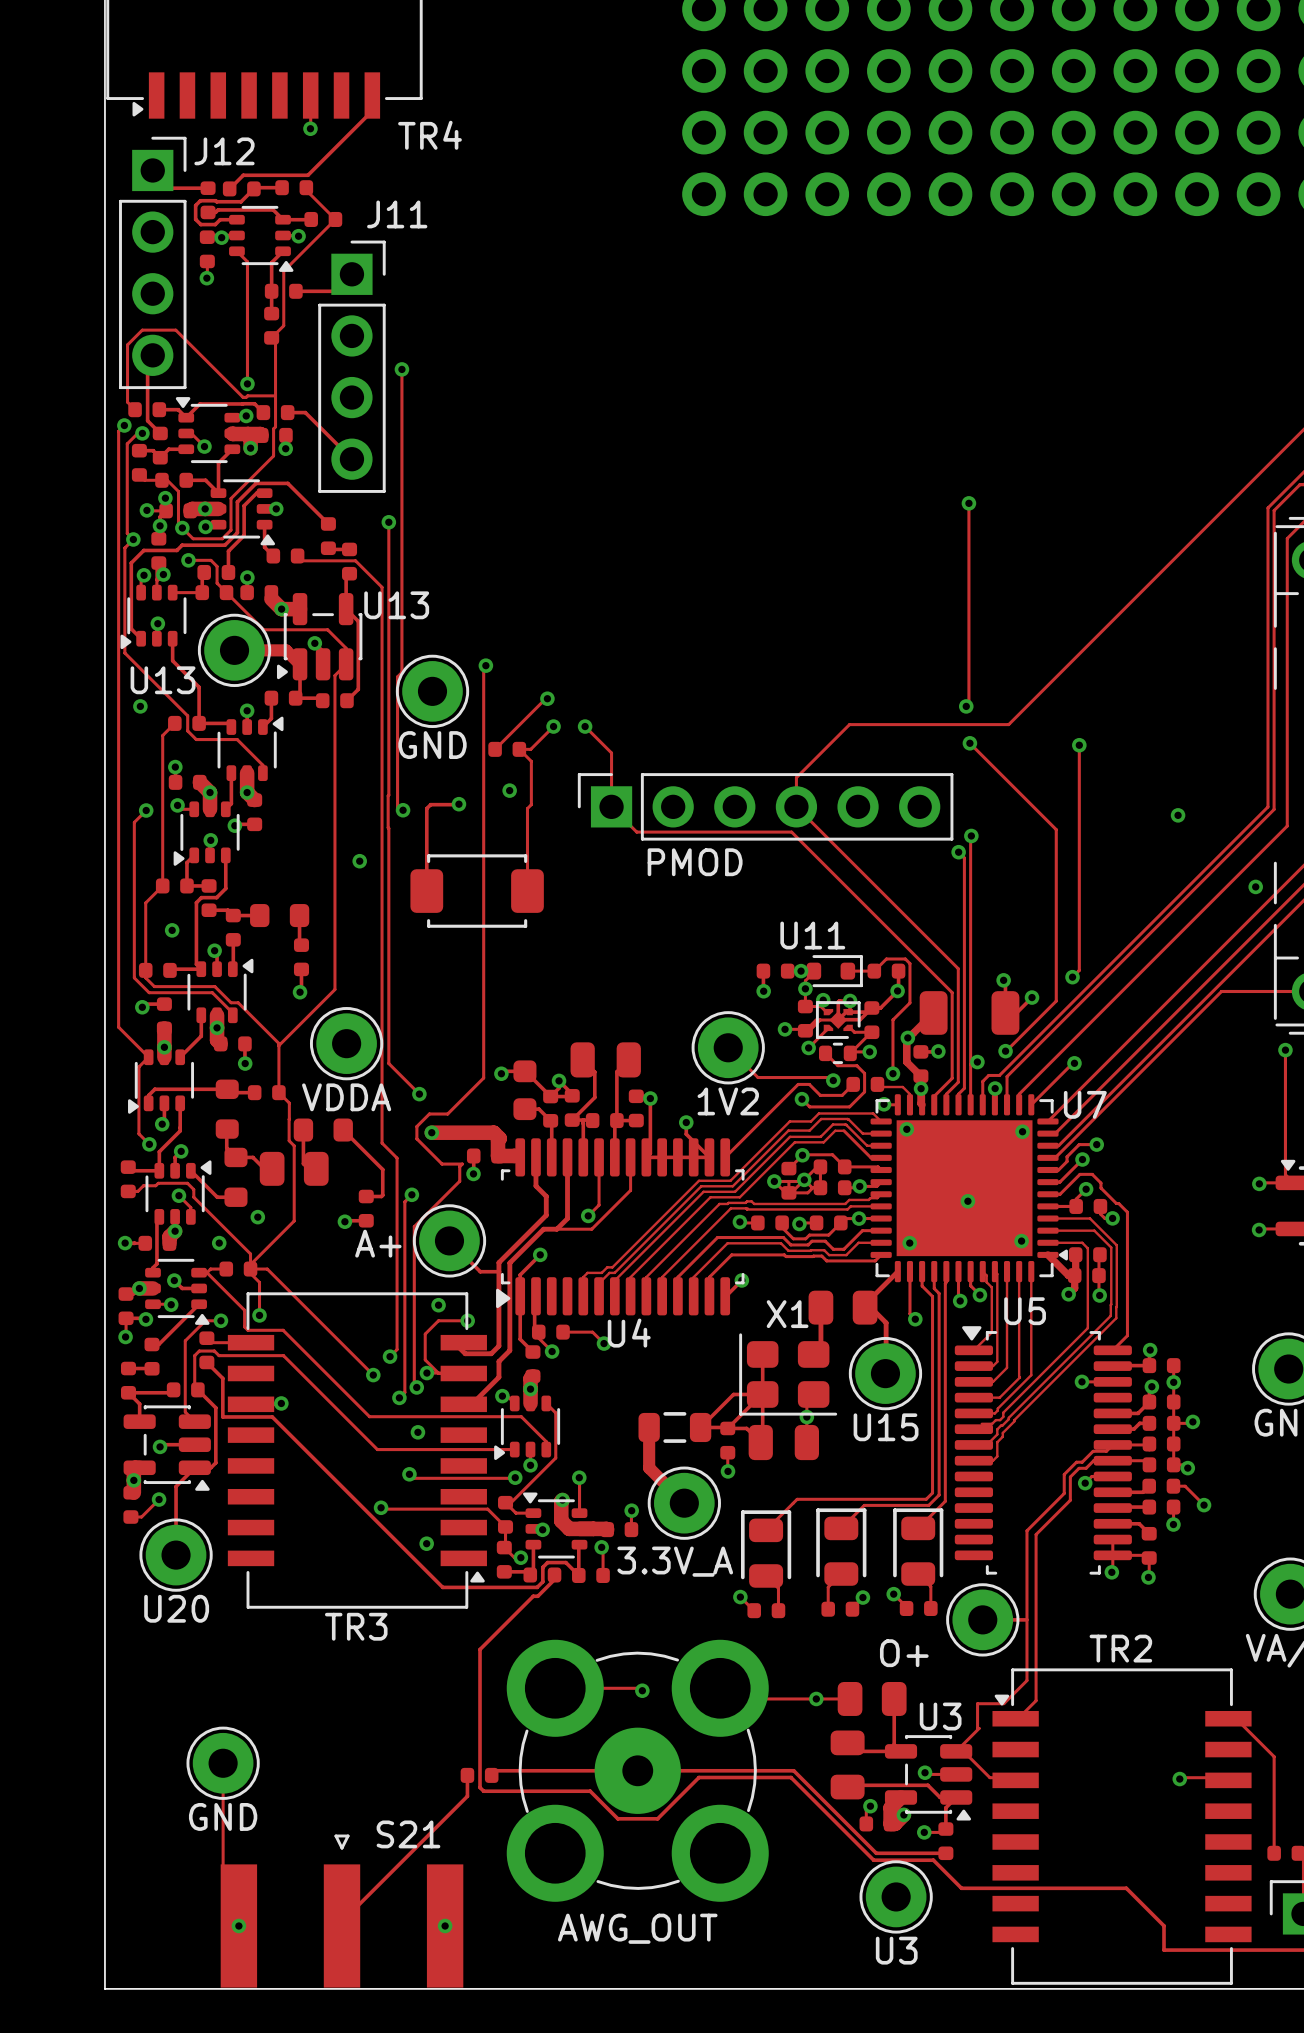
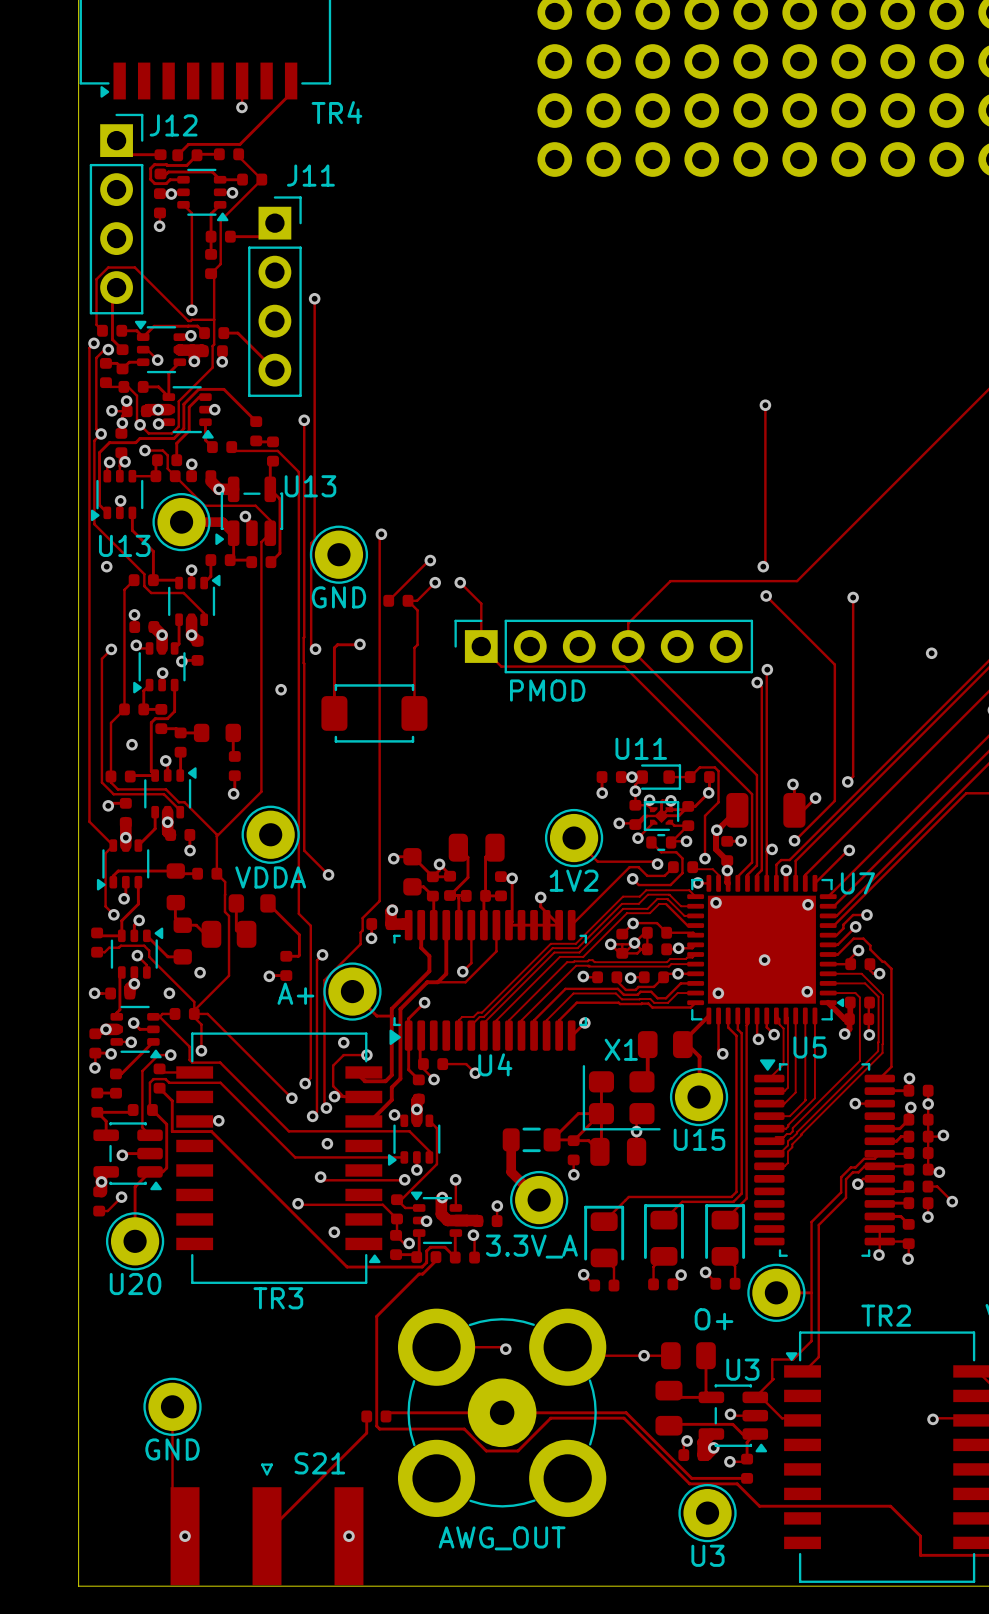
via: (509, 790) -> none
track: (483, 1078) (447, 1114) (429, 1114) (416, 1126) (416, 1138) (442, 1164) (462, 1164) -> (379, 862) (379, 901) (362, 918) (362, 930)
track: (431, 1132) (493, 1132) (499, 1138) -> none
via position: (431, 1132) -> (392, 910)

